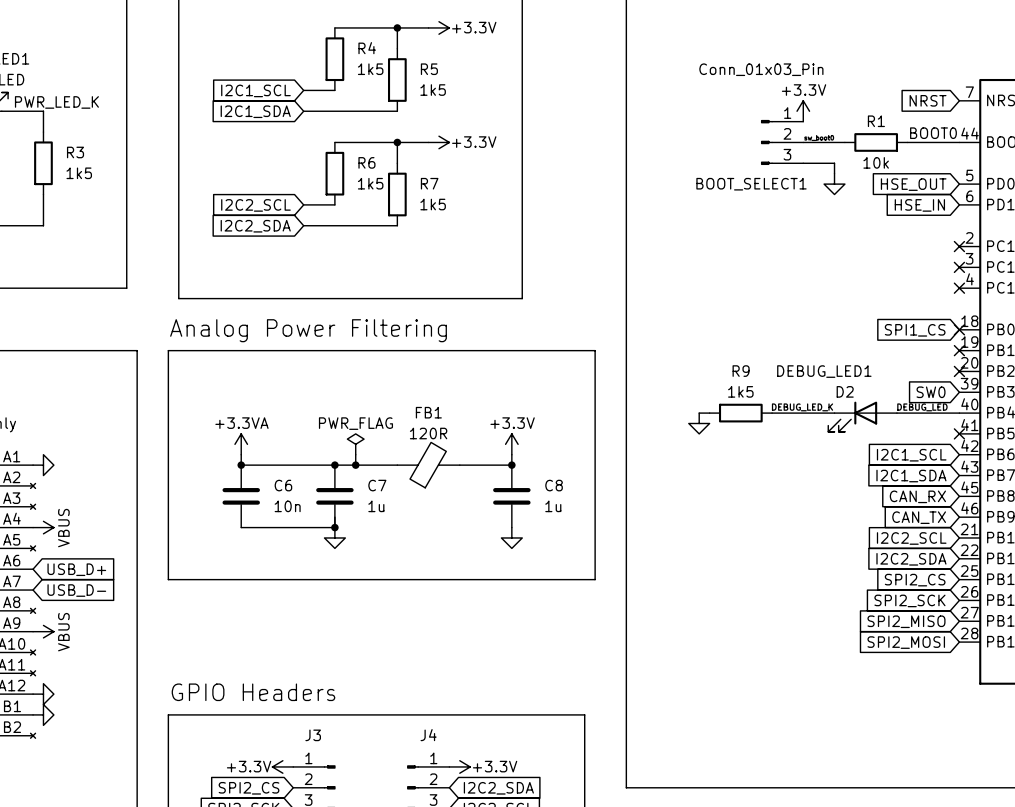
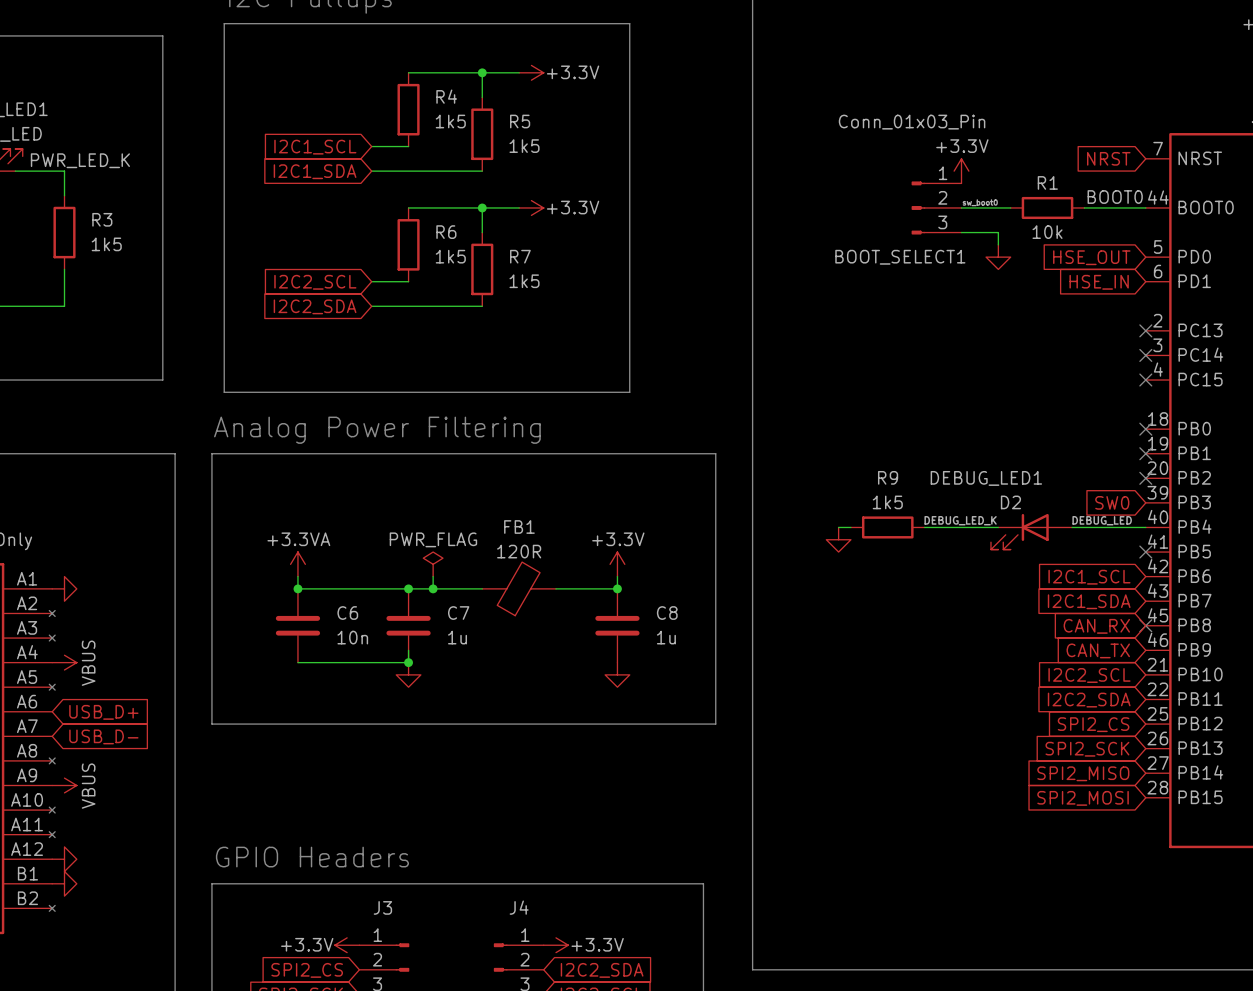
global label: SPI1_CS (915, 330) -> none
no-connect mark: none -> (1145, 625)

